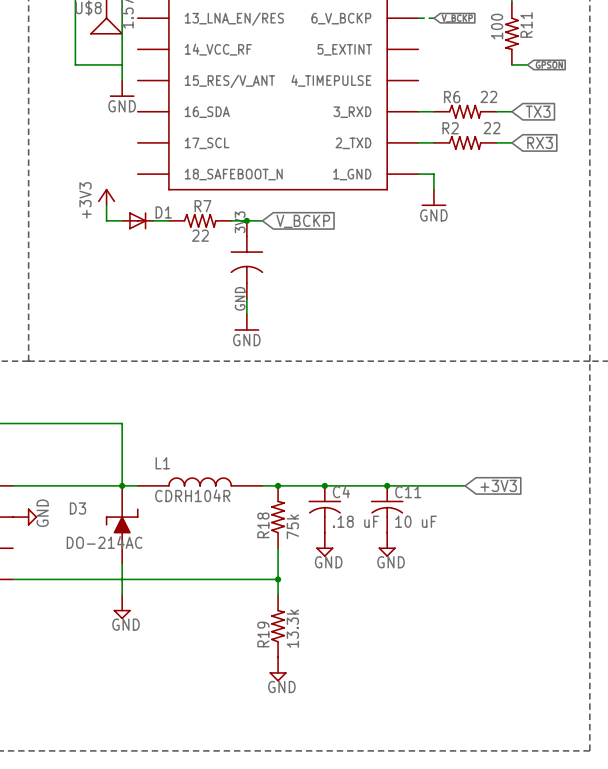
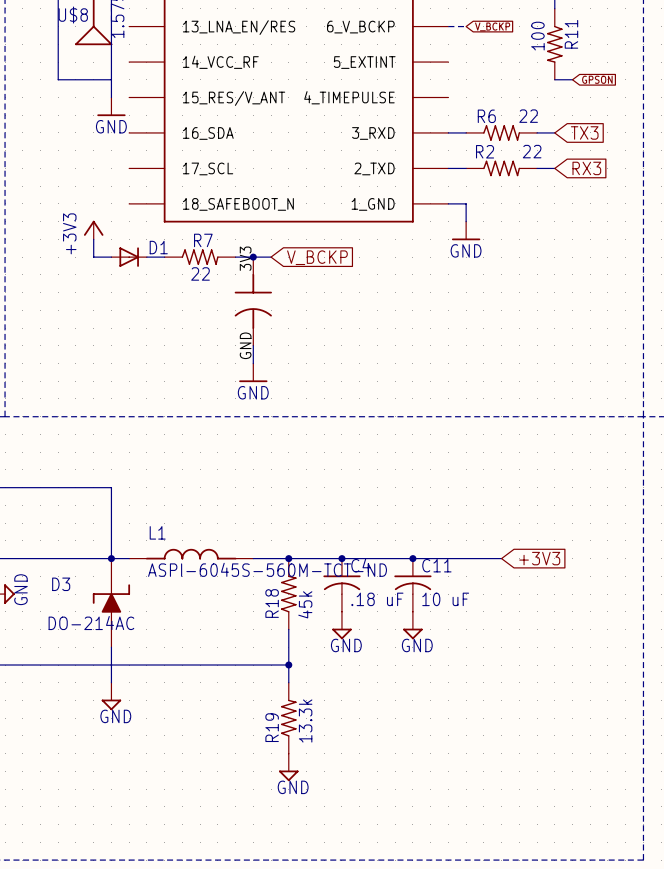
L1 symbol: [137, 477, 263, 487] -> [129, 548, 254, 560]
L1 value: CDRH104R (192, 495) -> ASPI-6045S-560M-TCT-ND (267, 569)
R18 value: 75k (292, 526) -> 45k (305, 604)

